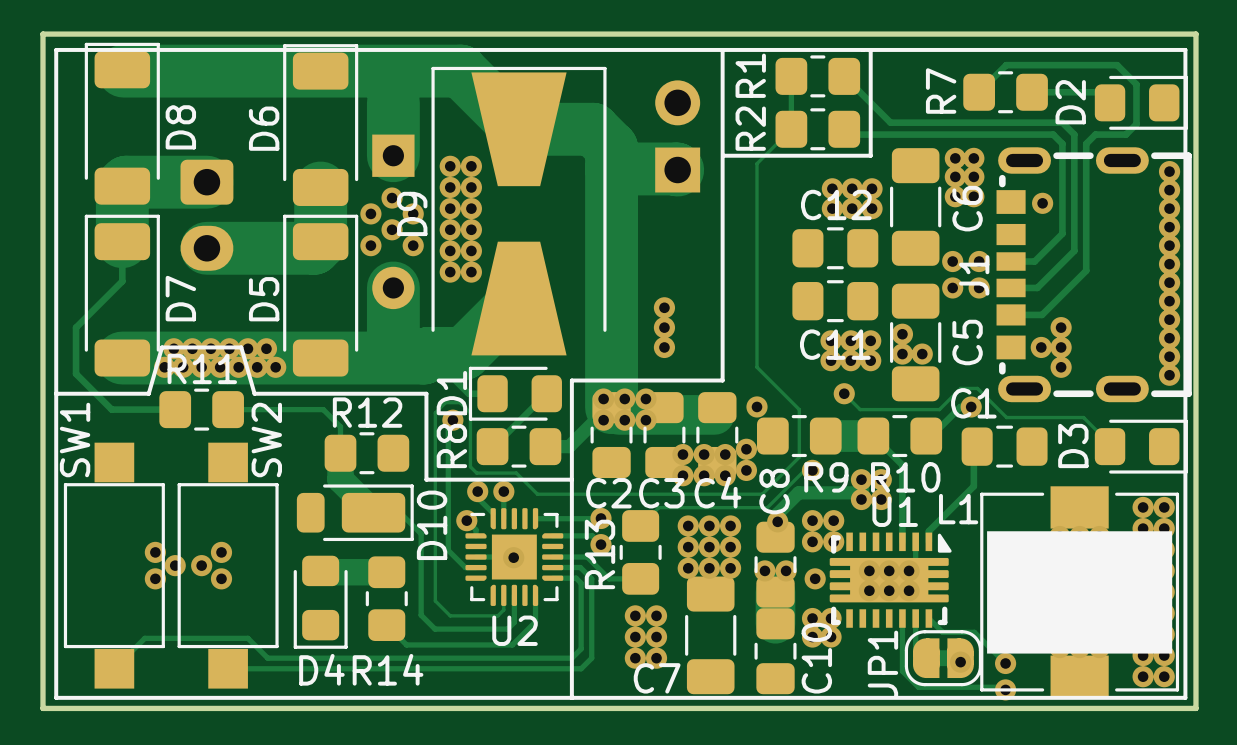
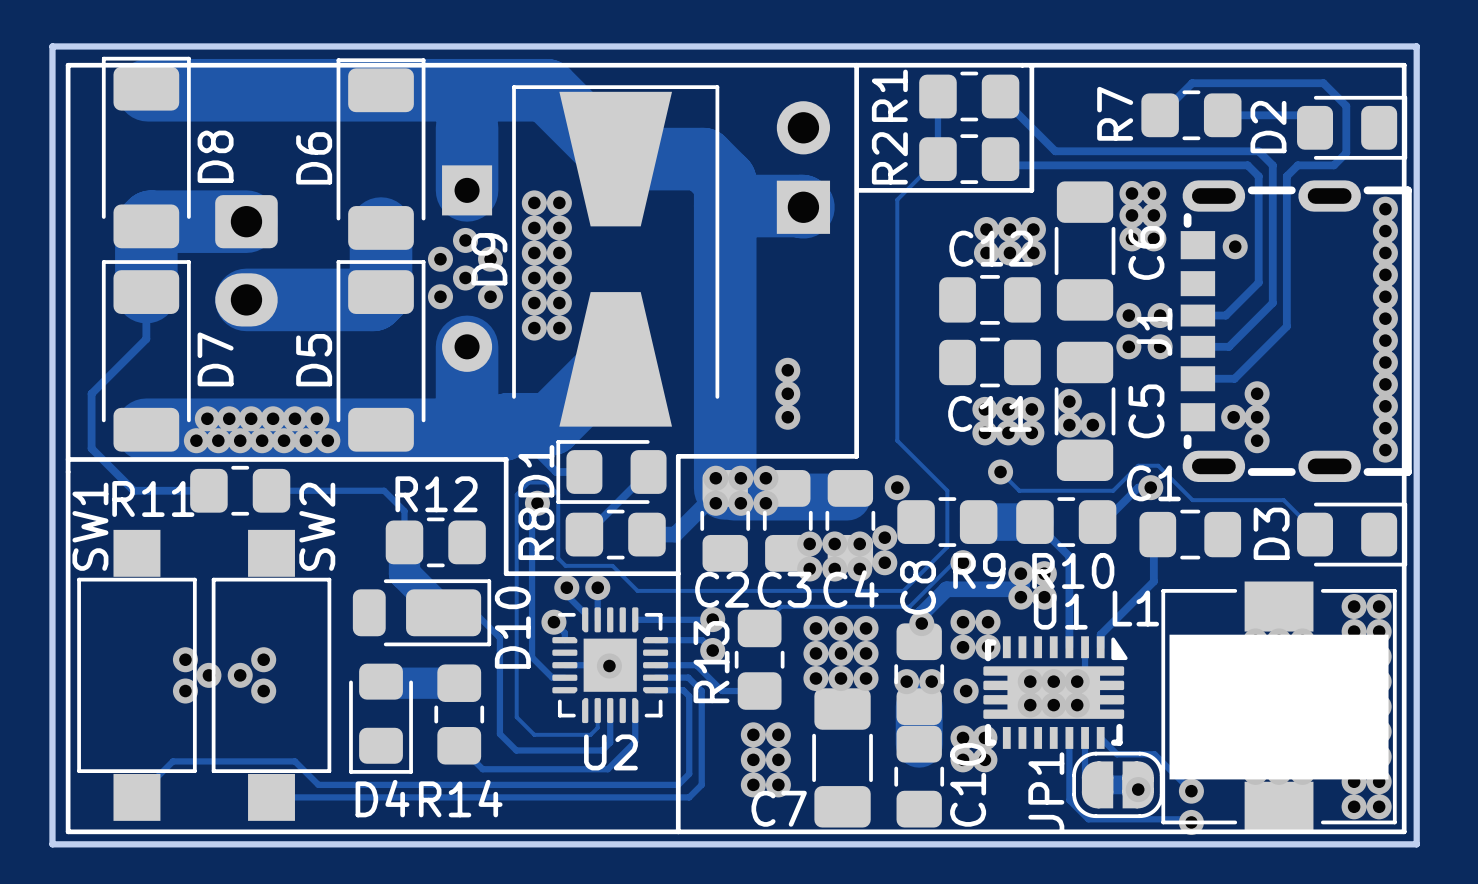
R11 name position: R11 (202, 368) -> R11 (153, 498)
line: (56, 393) (148, 393) (161, 347) (241, 347) (254, 393) (426, 393) -> (68, 459) (506, 459) (506, 471)

